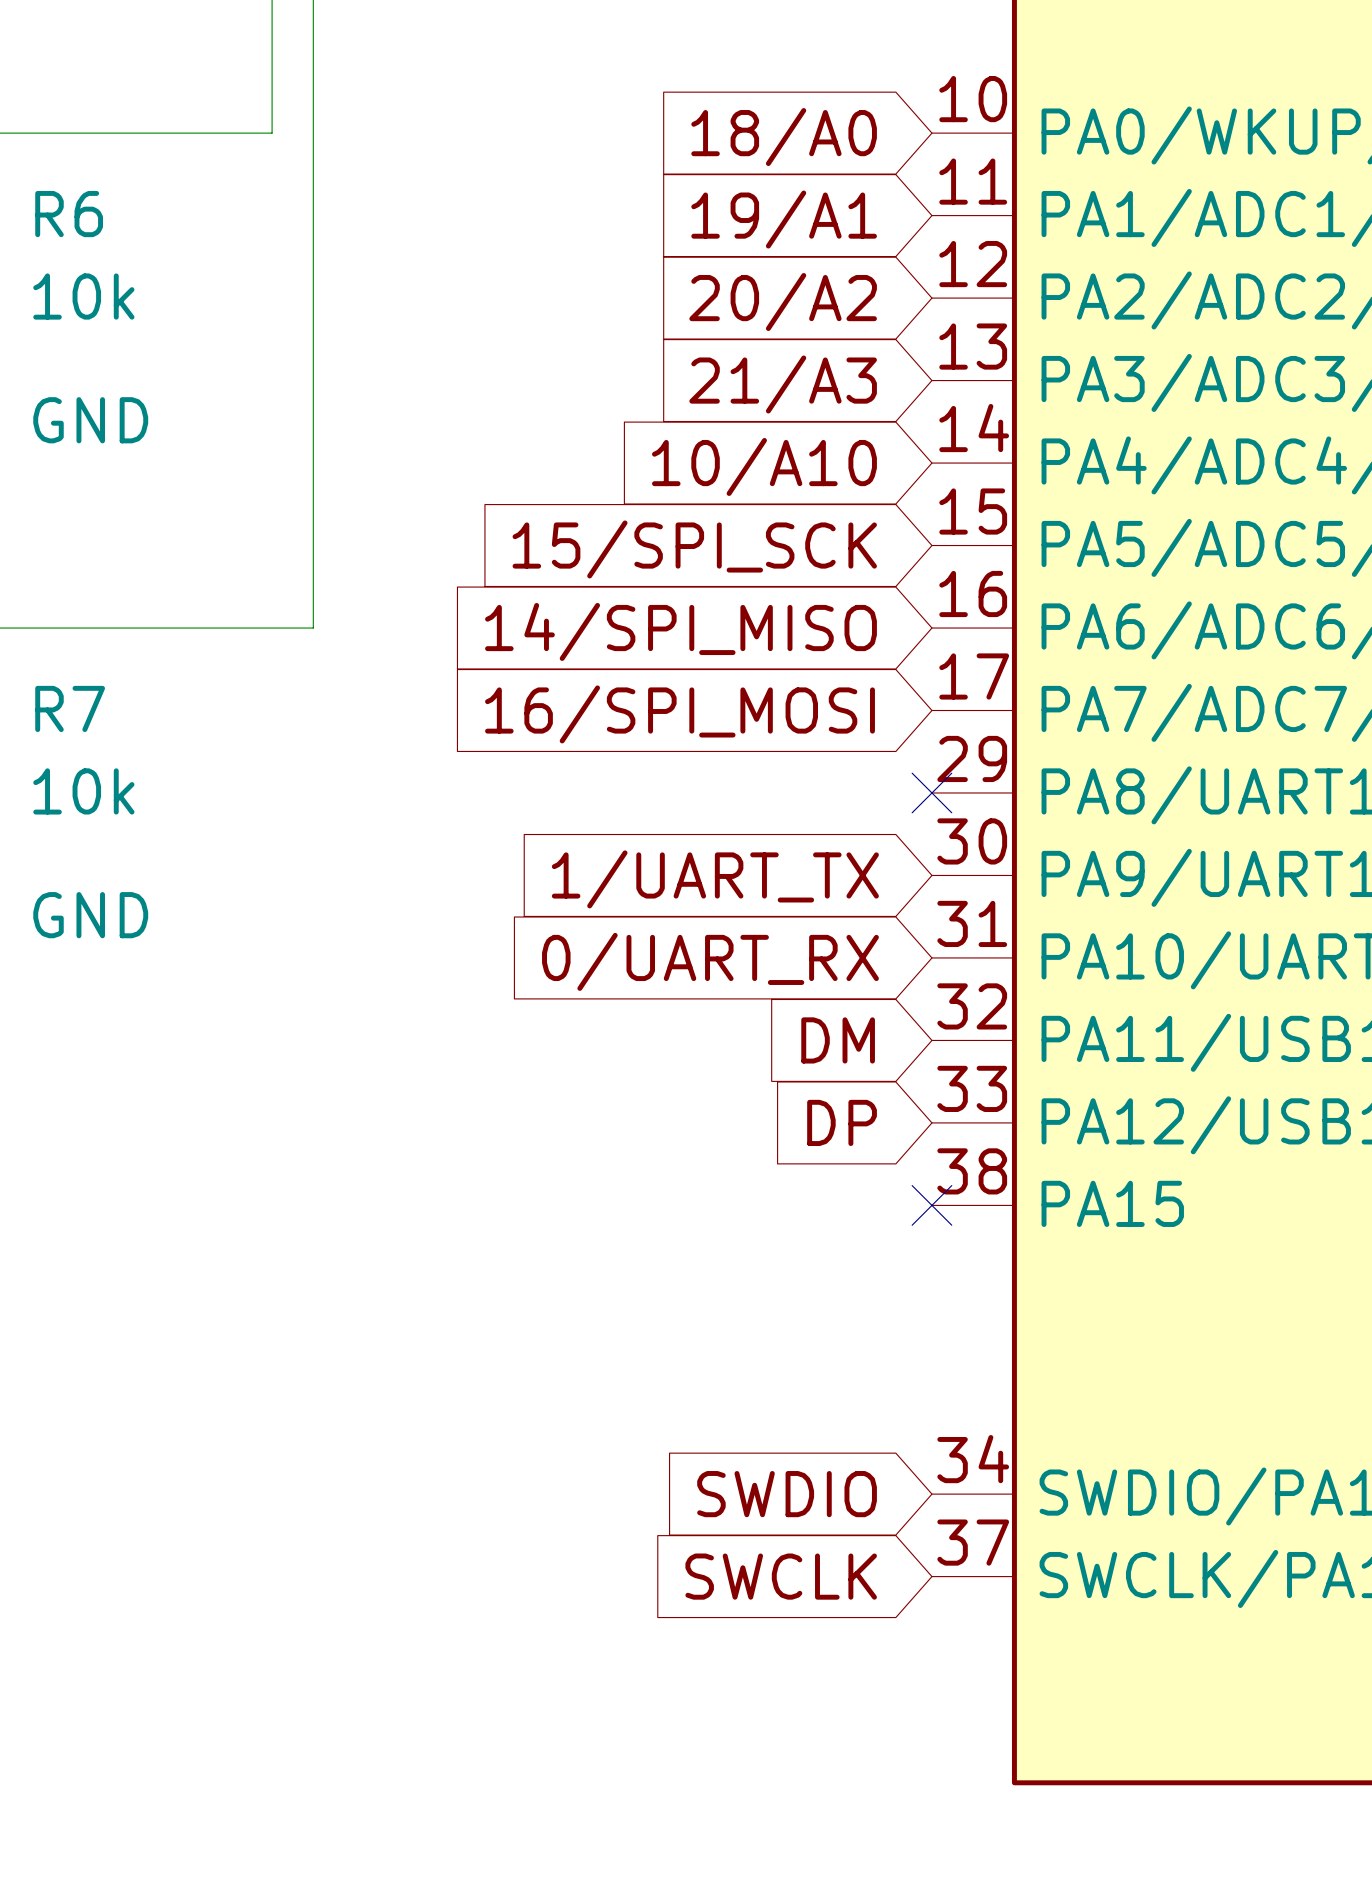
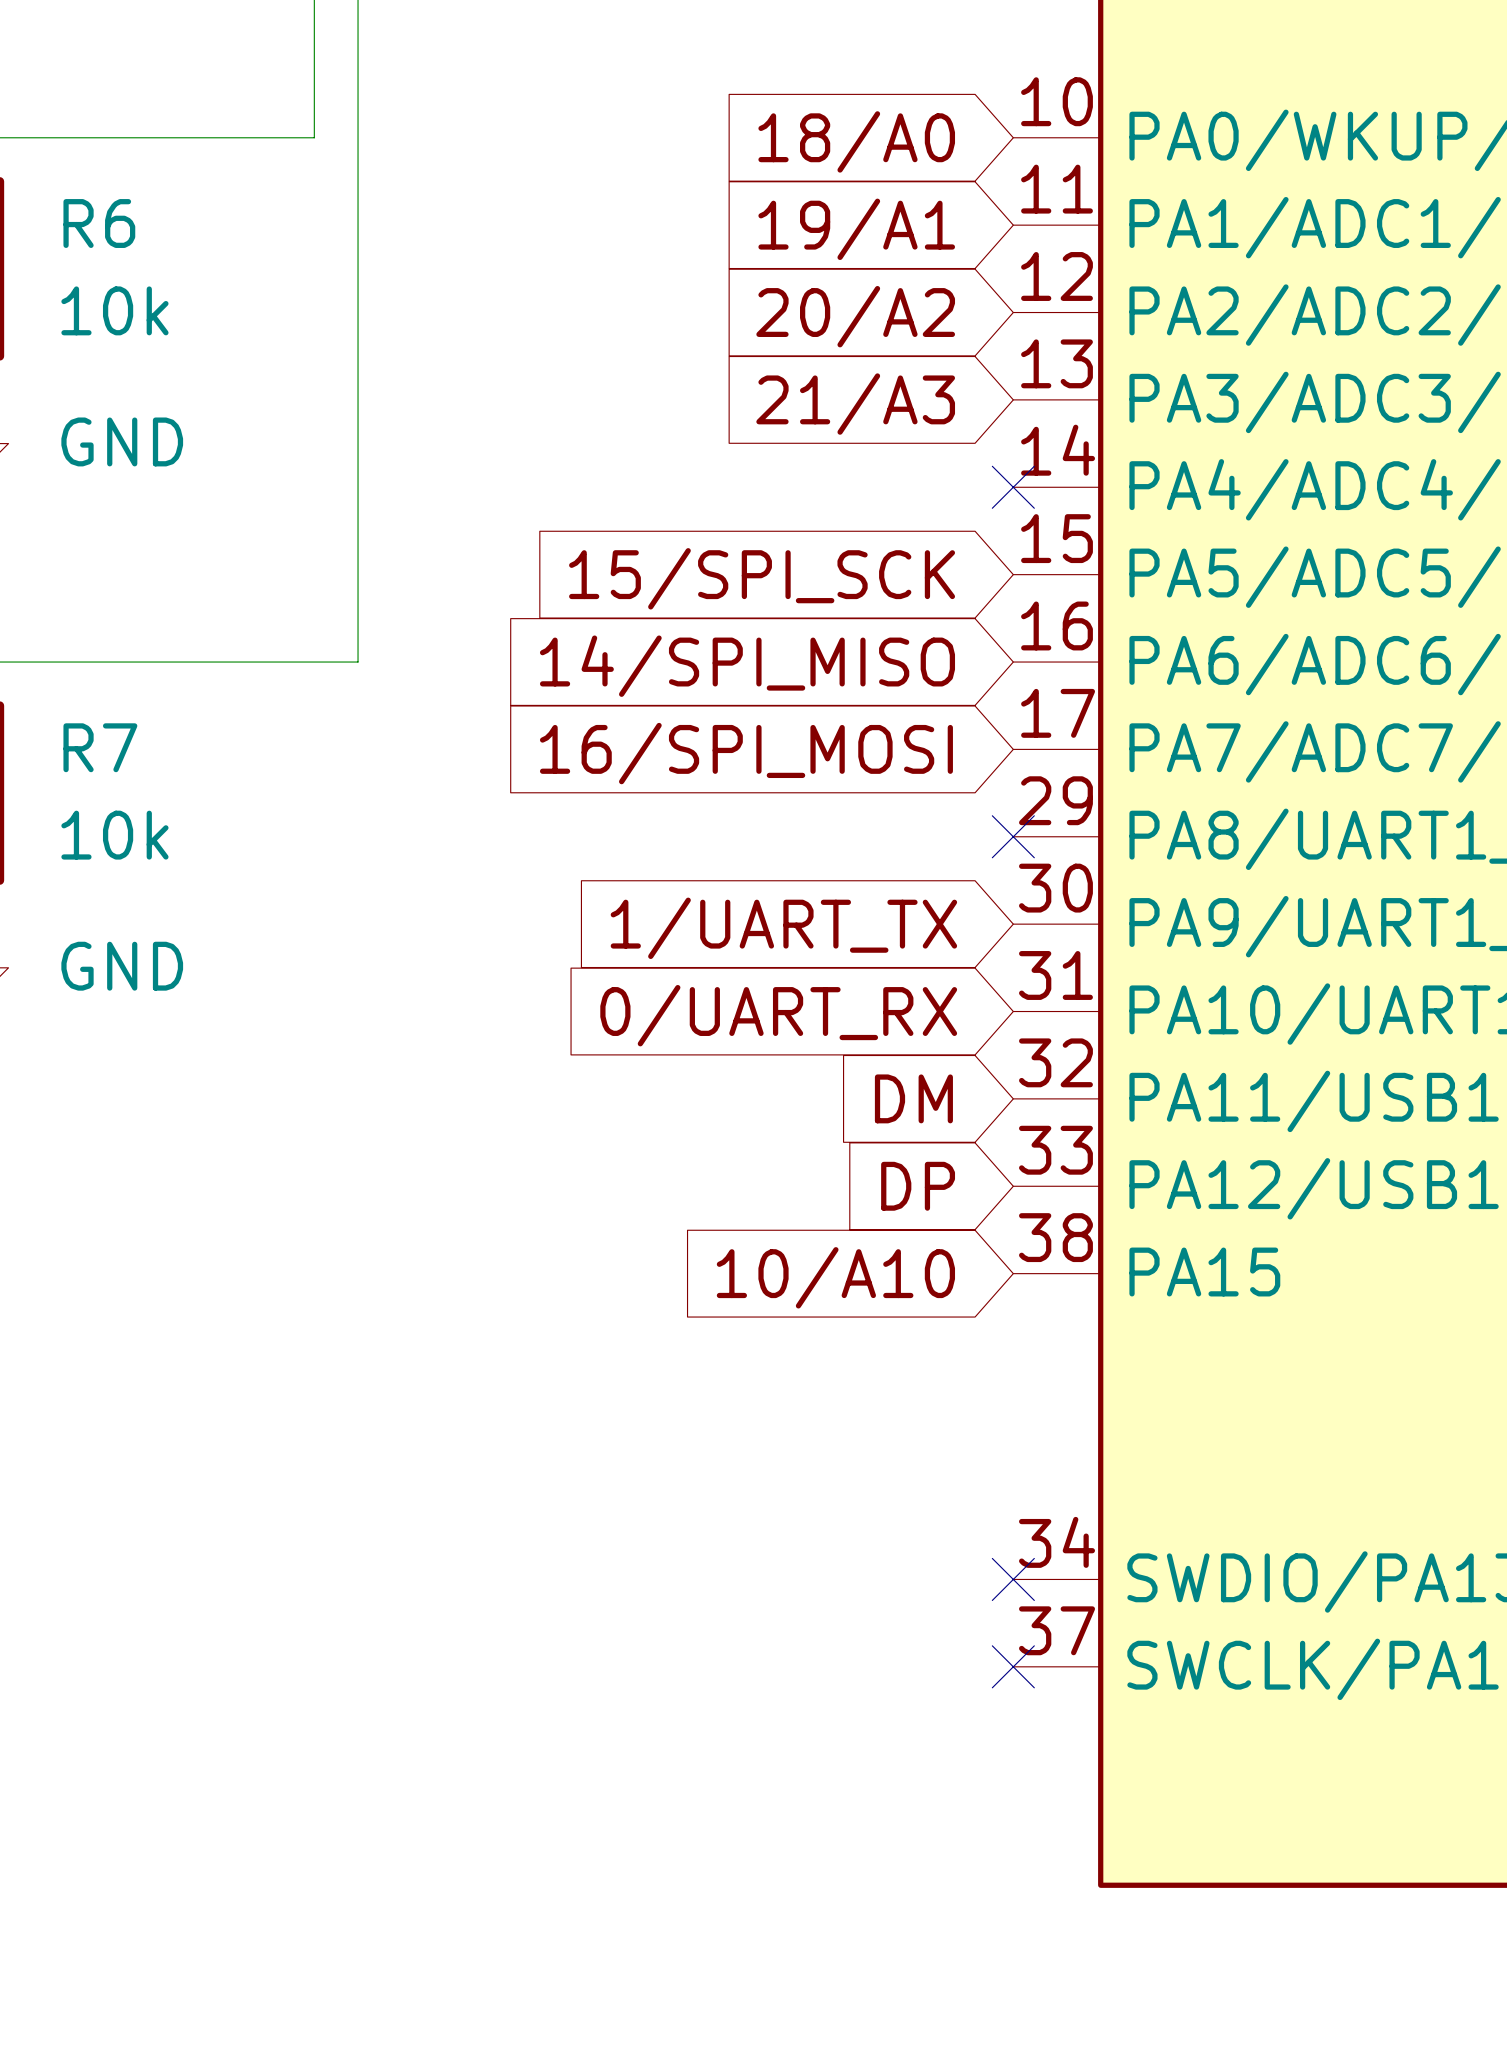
no-connect mark: none -> (1013, 487)
global label position: 10/A10 (764, 466) -> 10/A10 (835, 1277)
no-connect mark: (931, 1205) -> none
global label: SWDIO (787, 1494) -> none
no-connect mark: none -> (1013, 1579)
global label: SWCLK (781, 1576) -> none
no-connect mark: none -> (1013, 1666)

